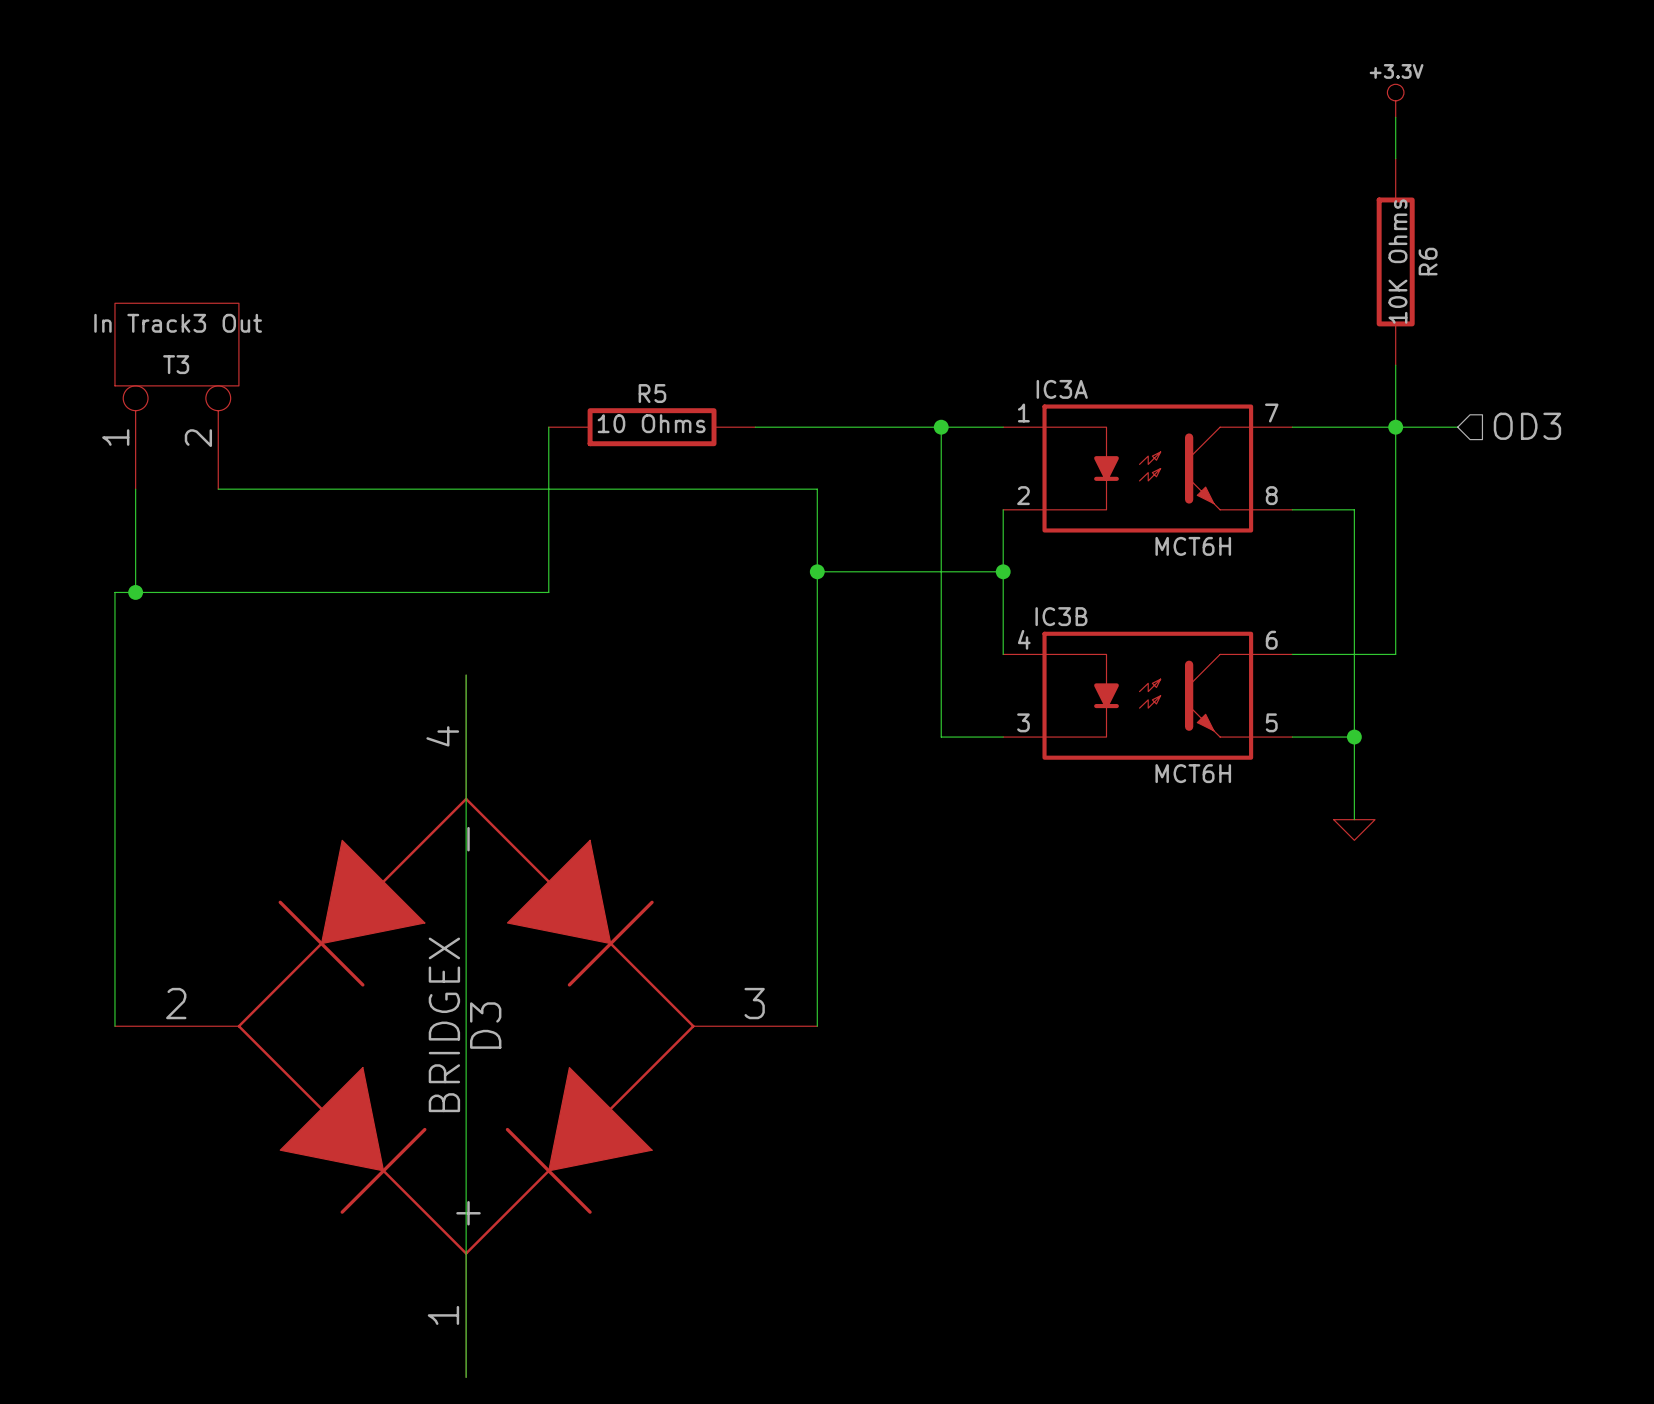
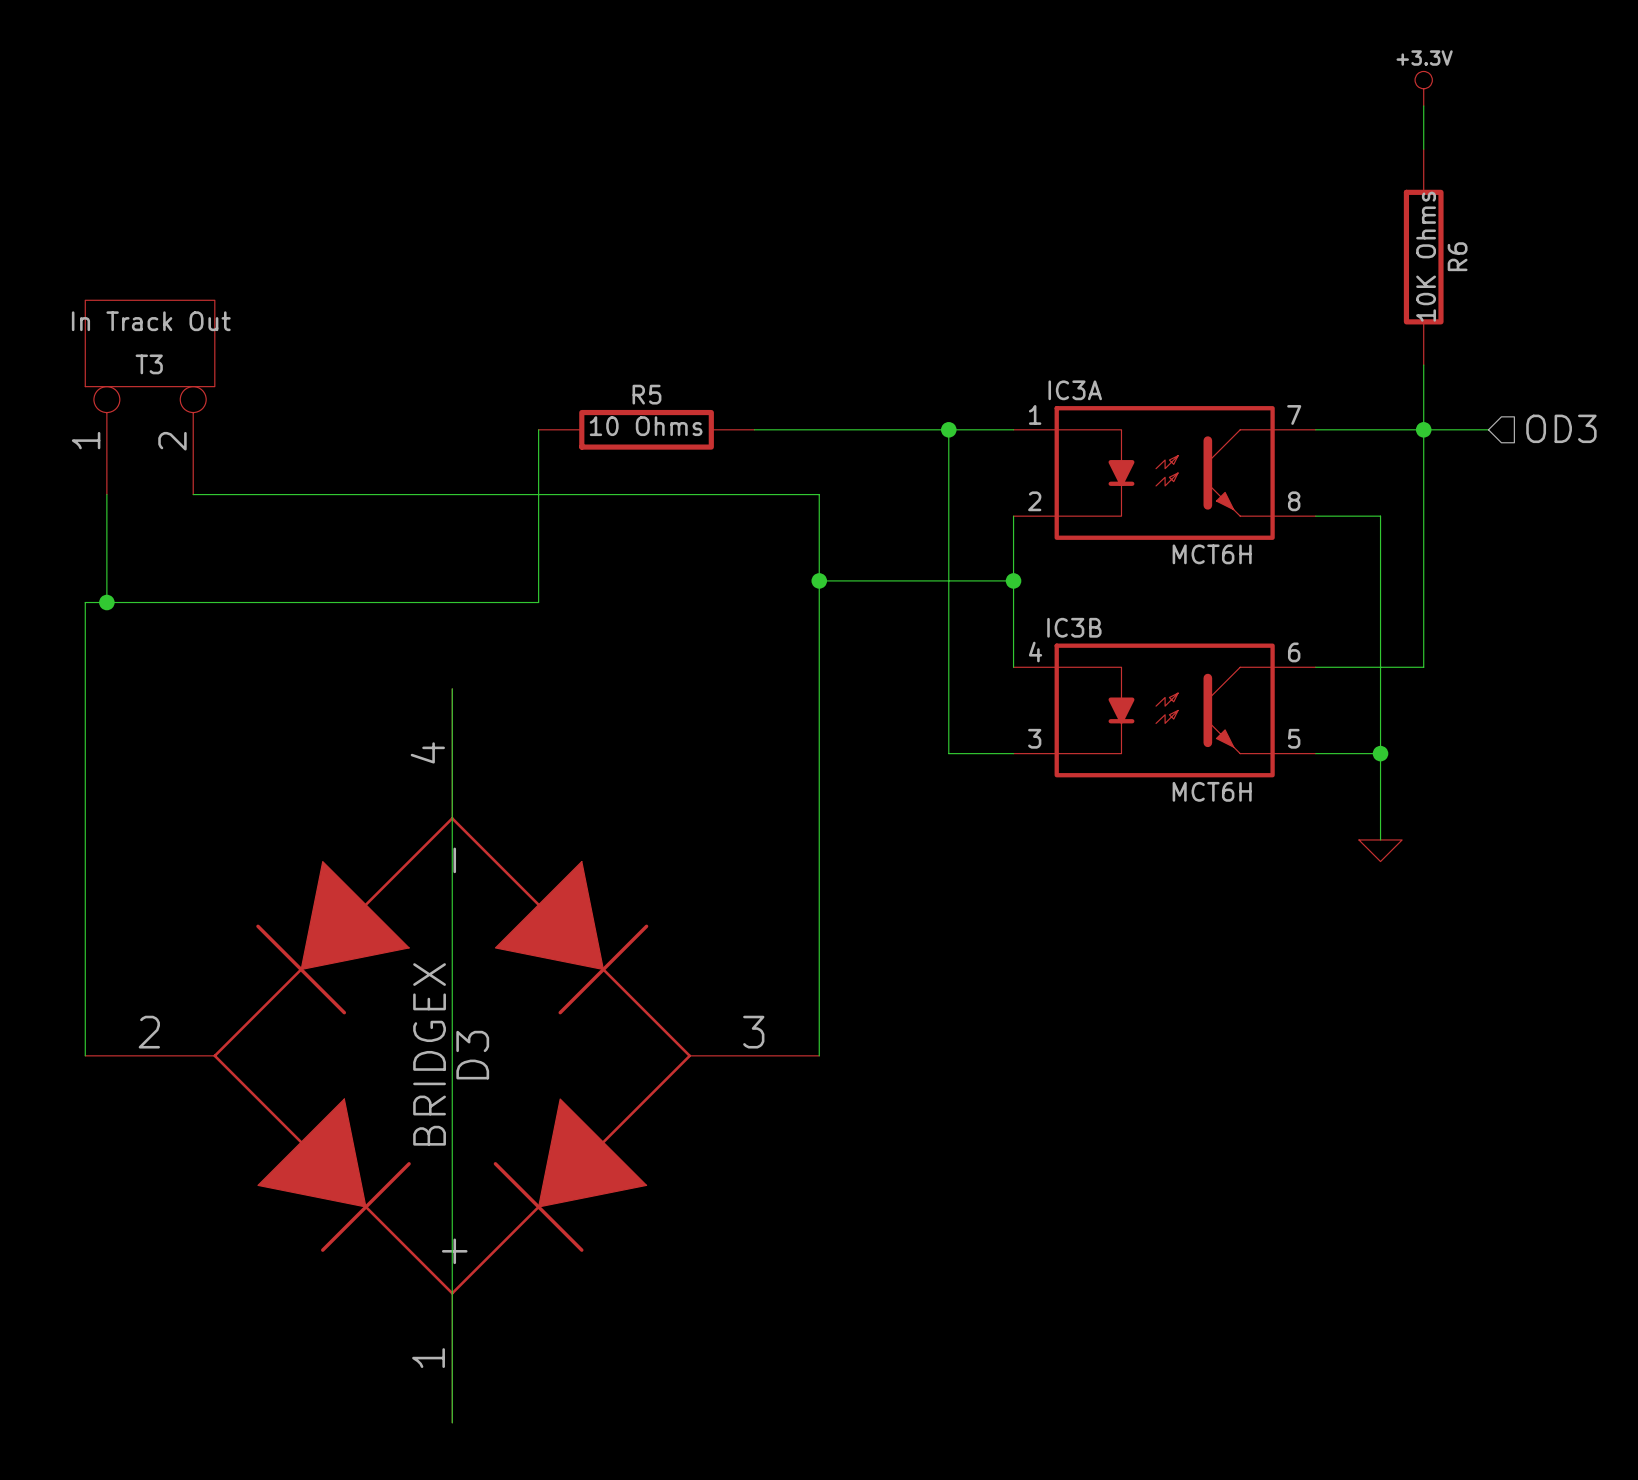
T3 value: In Track3 Out (178, 323) -> In Track Out (151, 321)

